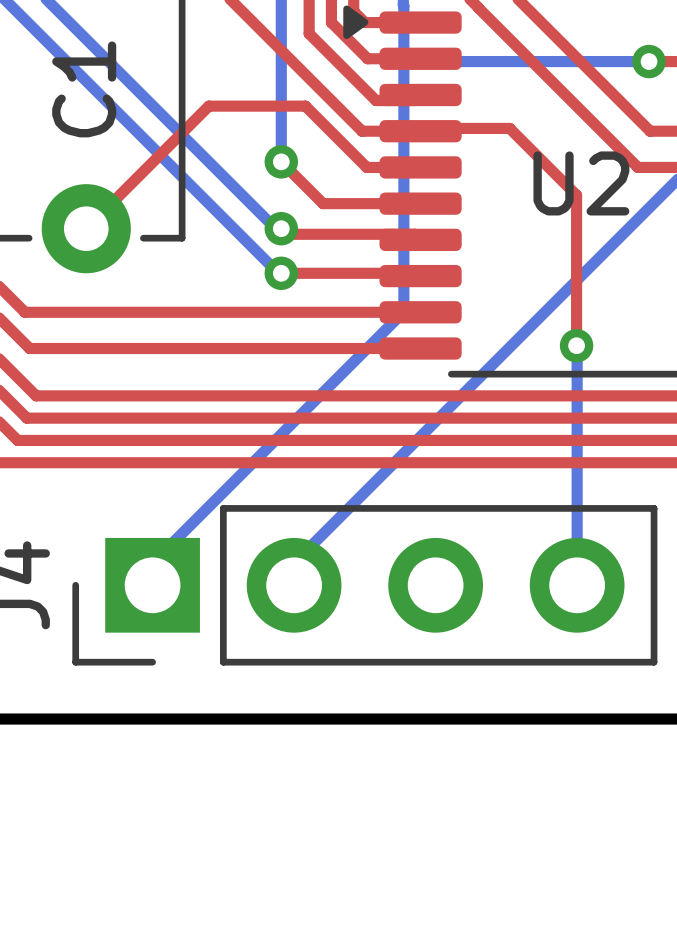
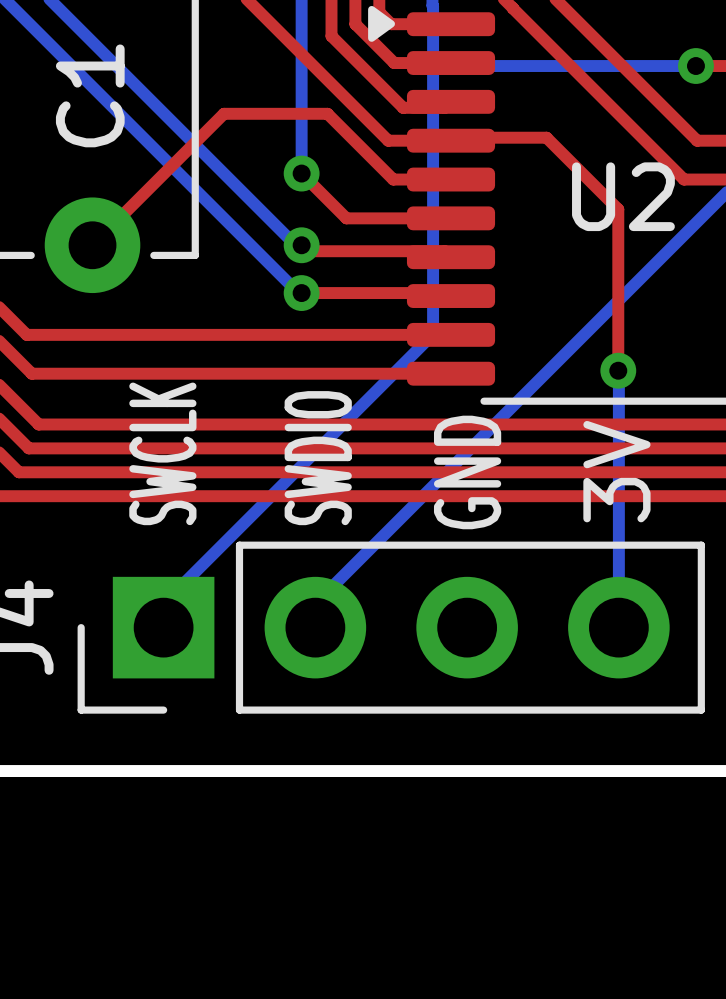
text: none -> SWCLK (162, 453)
text: none -> SWDIO (318, 458)
text: none -> 3V (616, 471)
text: none -> GND (467, 472)

